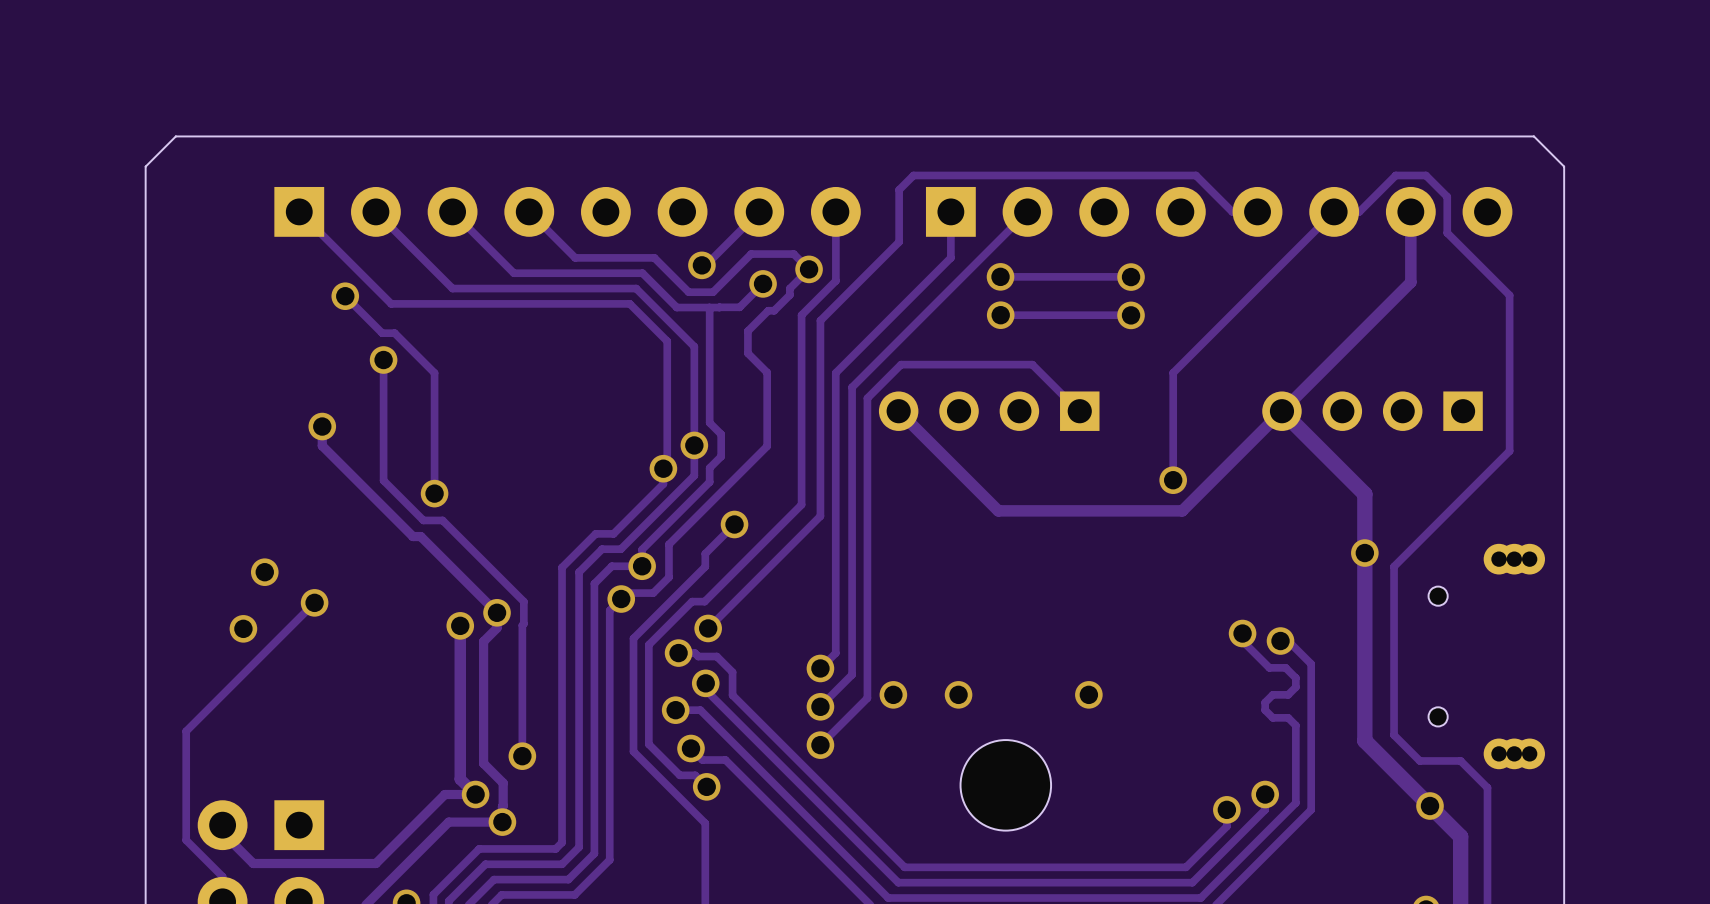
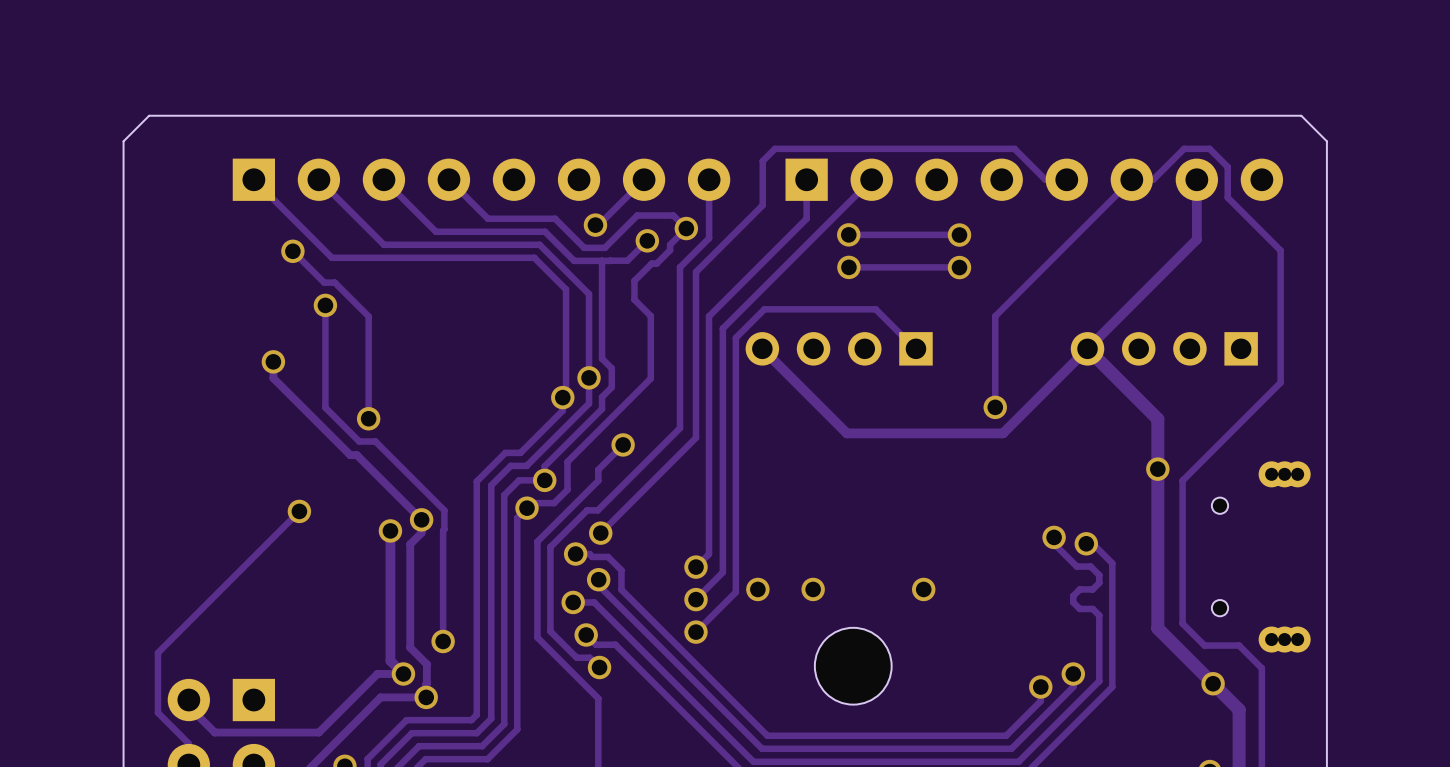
via: (264, 572) -> none
track: (314, 602) (186, 731) (186, 769) -> (299, 511) (157, 652)
via position: (314, 602) -> (299, 511)
via: (243, 628) -> none

